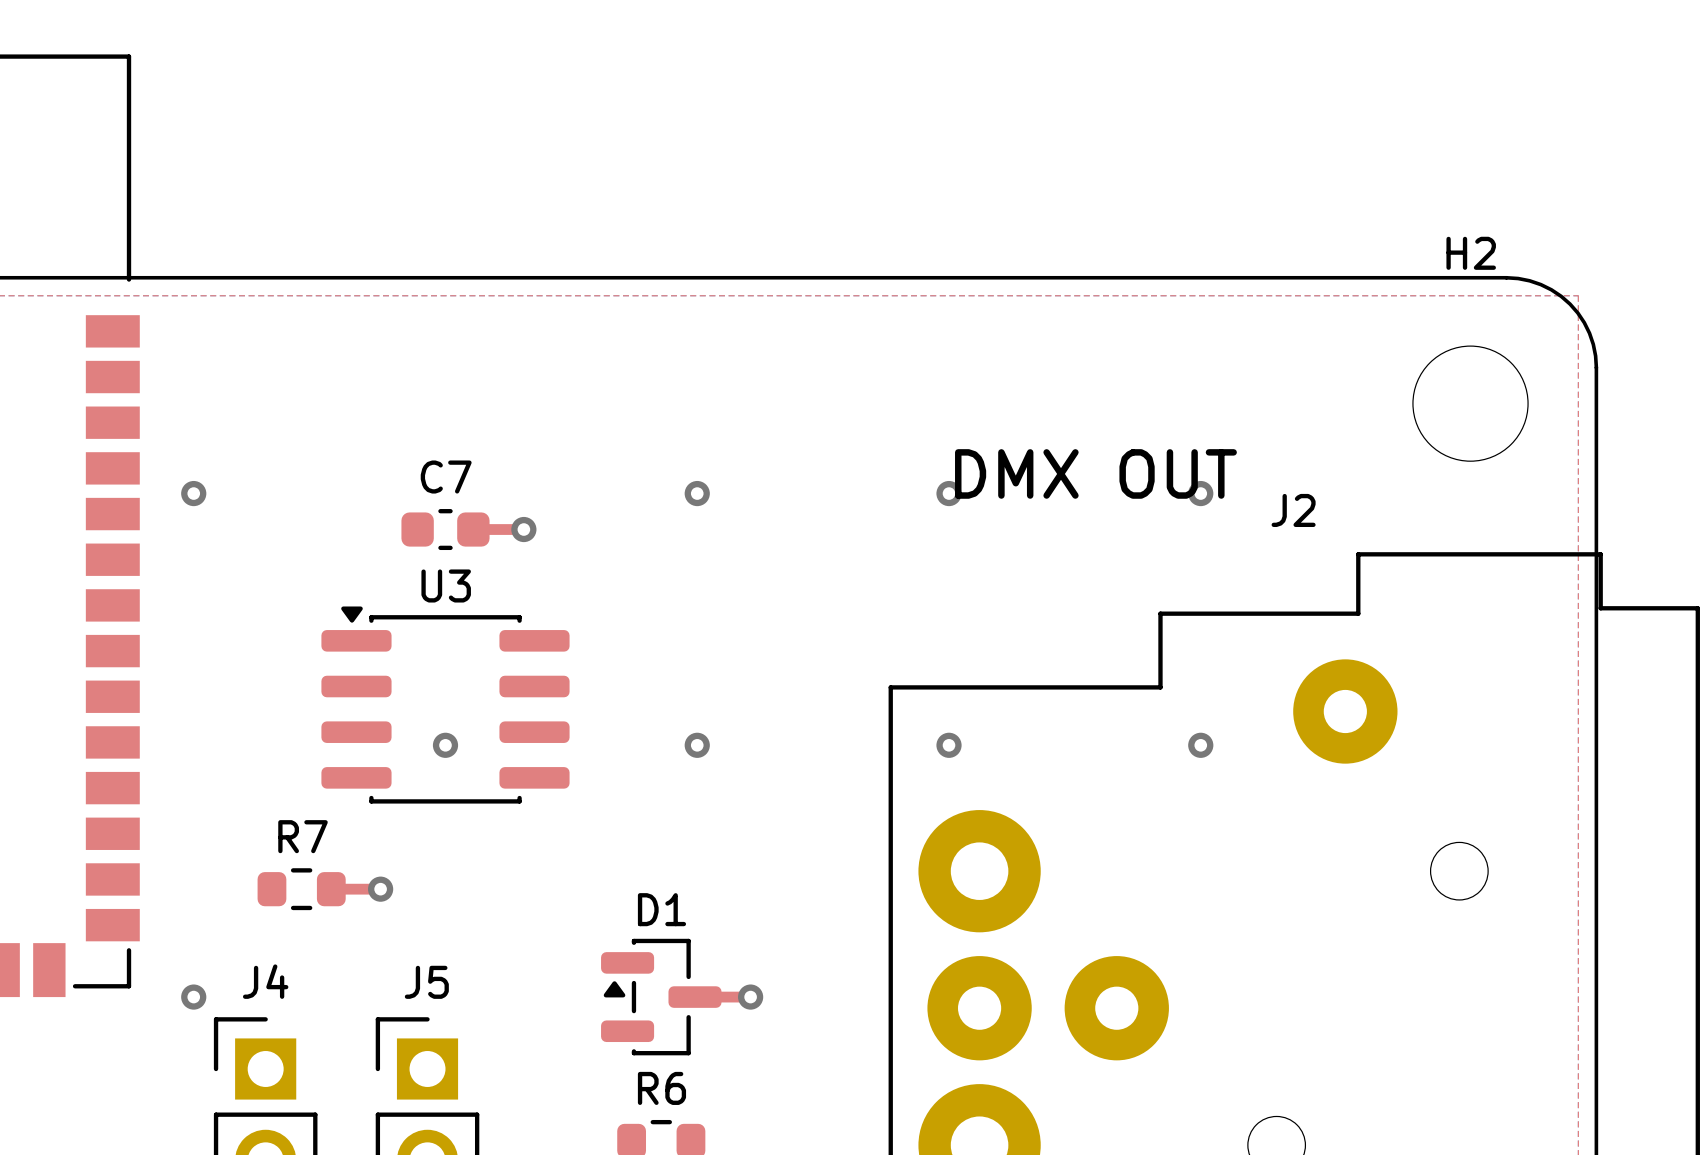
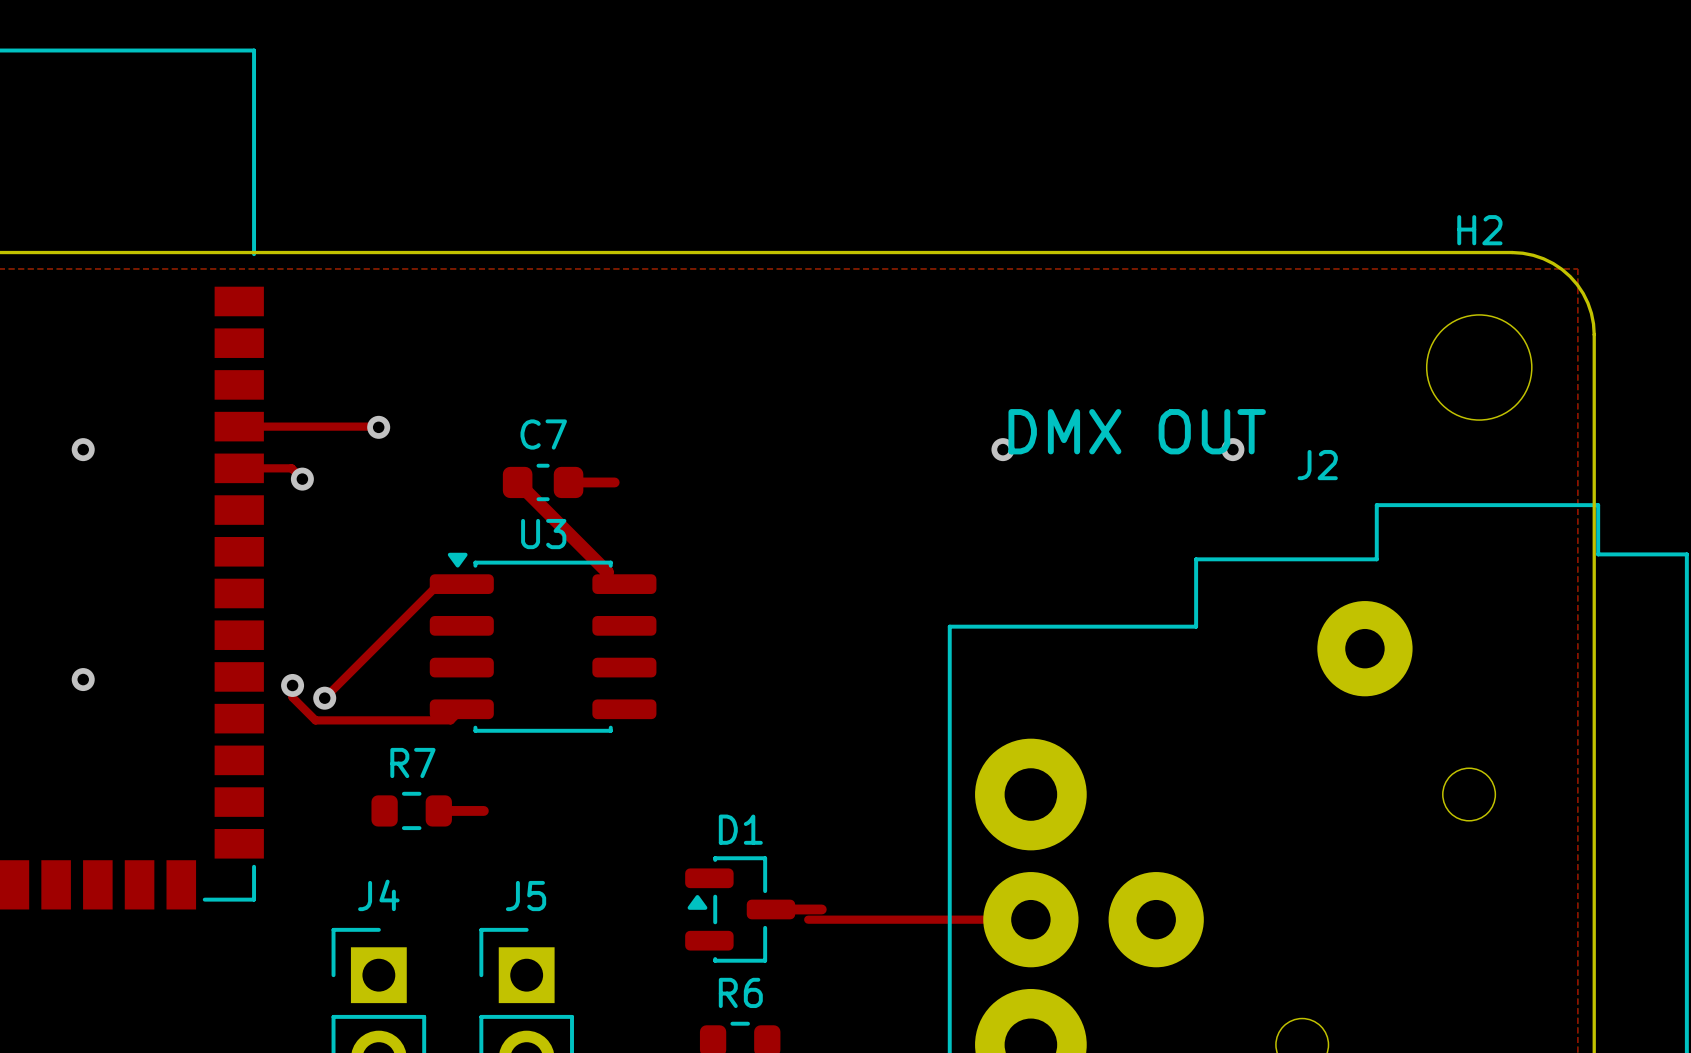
top track: none -> (239, 426) (378, 427)
via: none -> (378, 427)
via position: (193, 493) -> (302, 479)
via: (697, 493) -> none
top track: none -> (239, 468) (291, 468) (302, 479)
top track: none -> (517, 482) (607, 571) (607, 584) (624, 584)
via: (523, 529) -> none
top track: none -> (461, 584) (438, 584) (324, 698)
via: (445, 745) -> none
via: (697, 745) -> none
via: (949, 745) -> none
via: (1200, 745) -> none
top track: none -> (292, 685) (292, 697) (315, 720) (450, 720) (461, 709)
via: none -> (292, 685)
via: none -> (324, 698)
via: (380, 889) -> none
via: (193, 997) -> none
via: (750, 997) -> none
top track: none -> (808, 919) (1030, 919)

